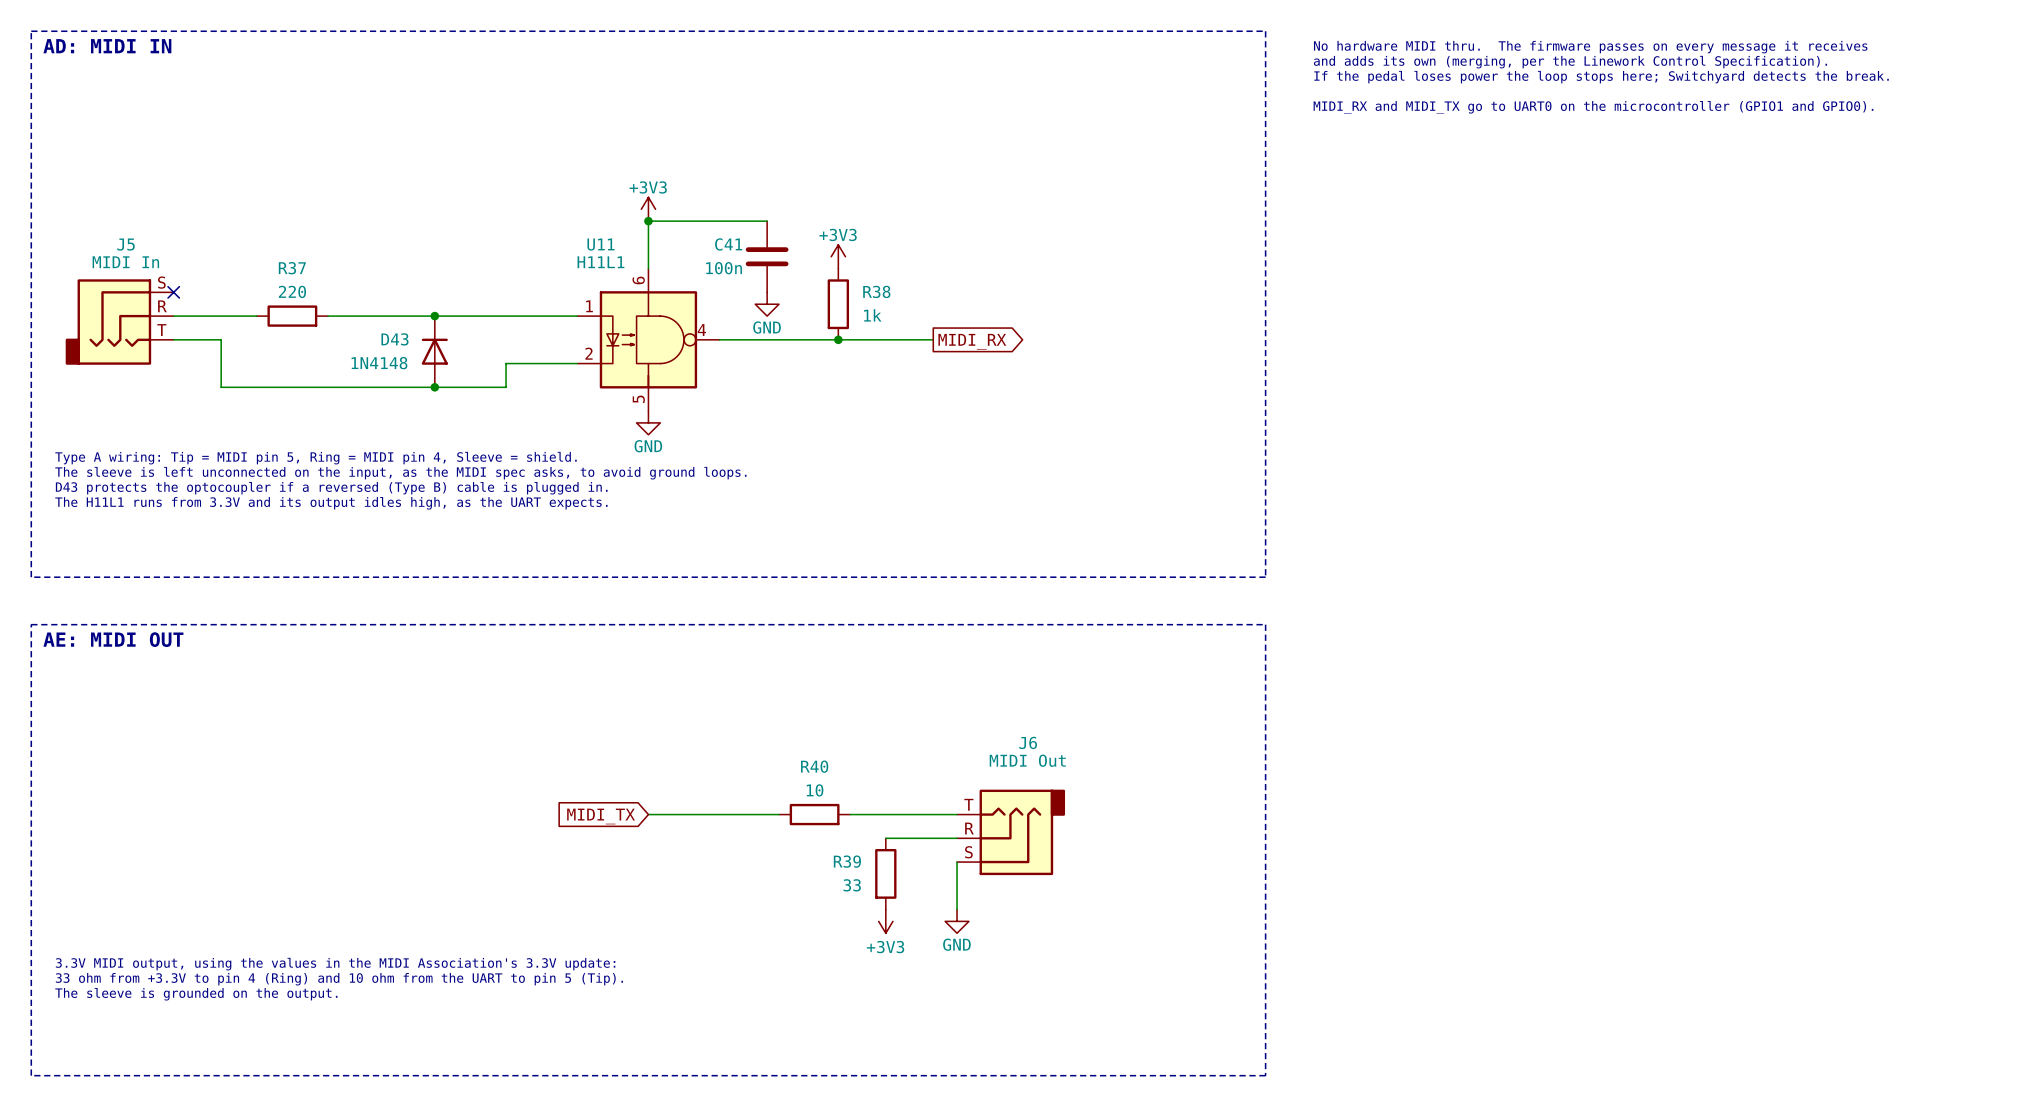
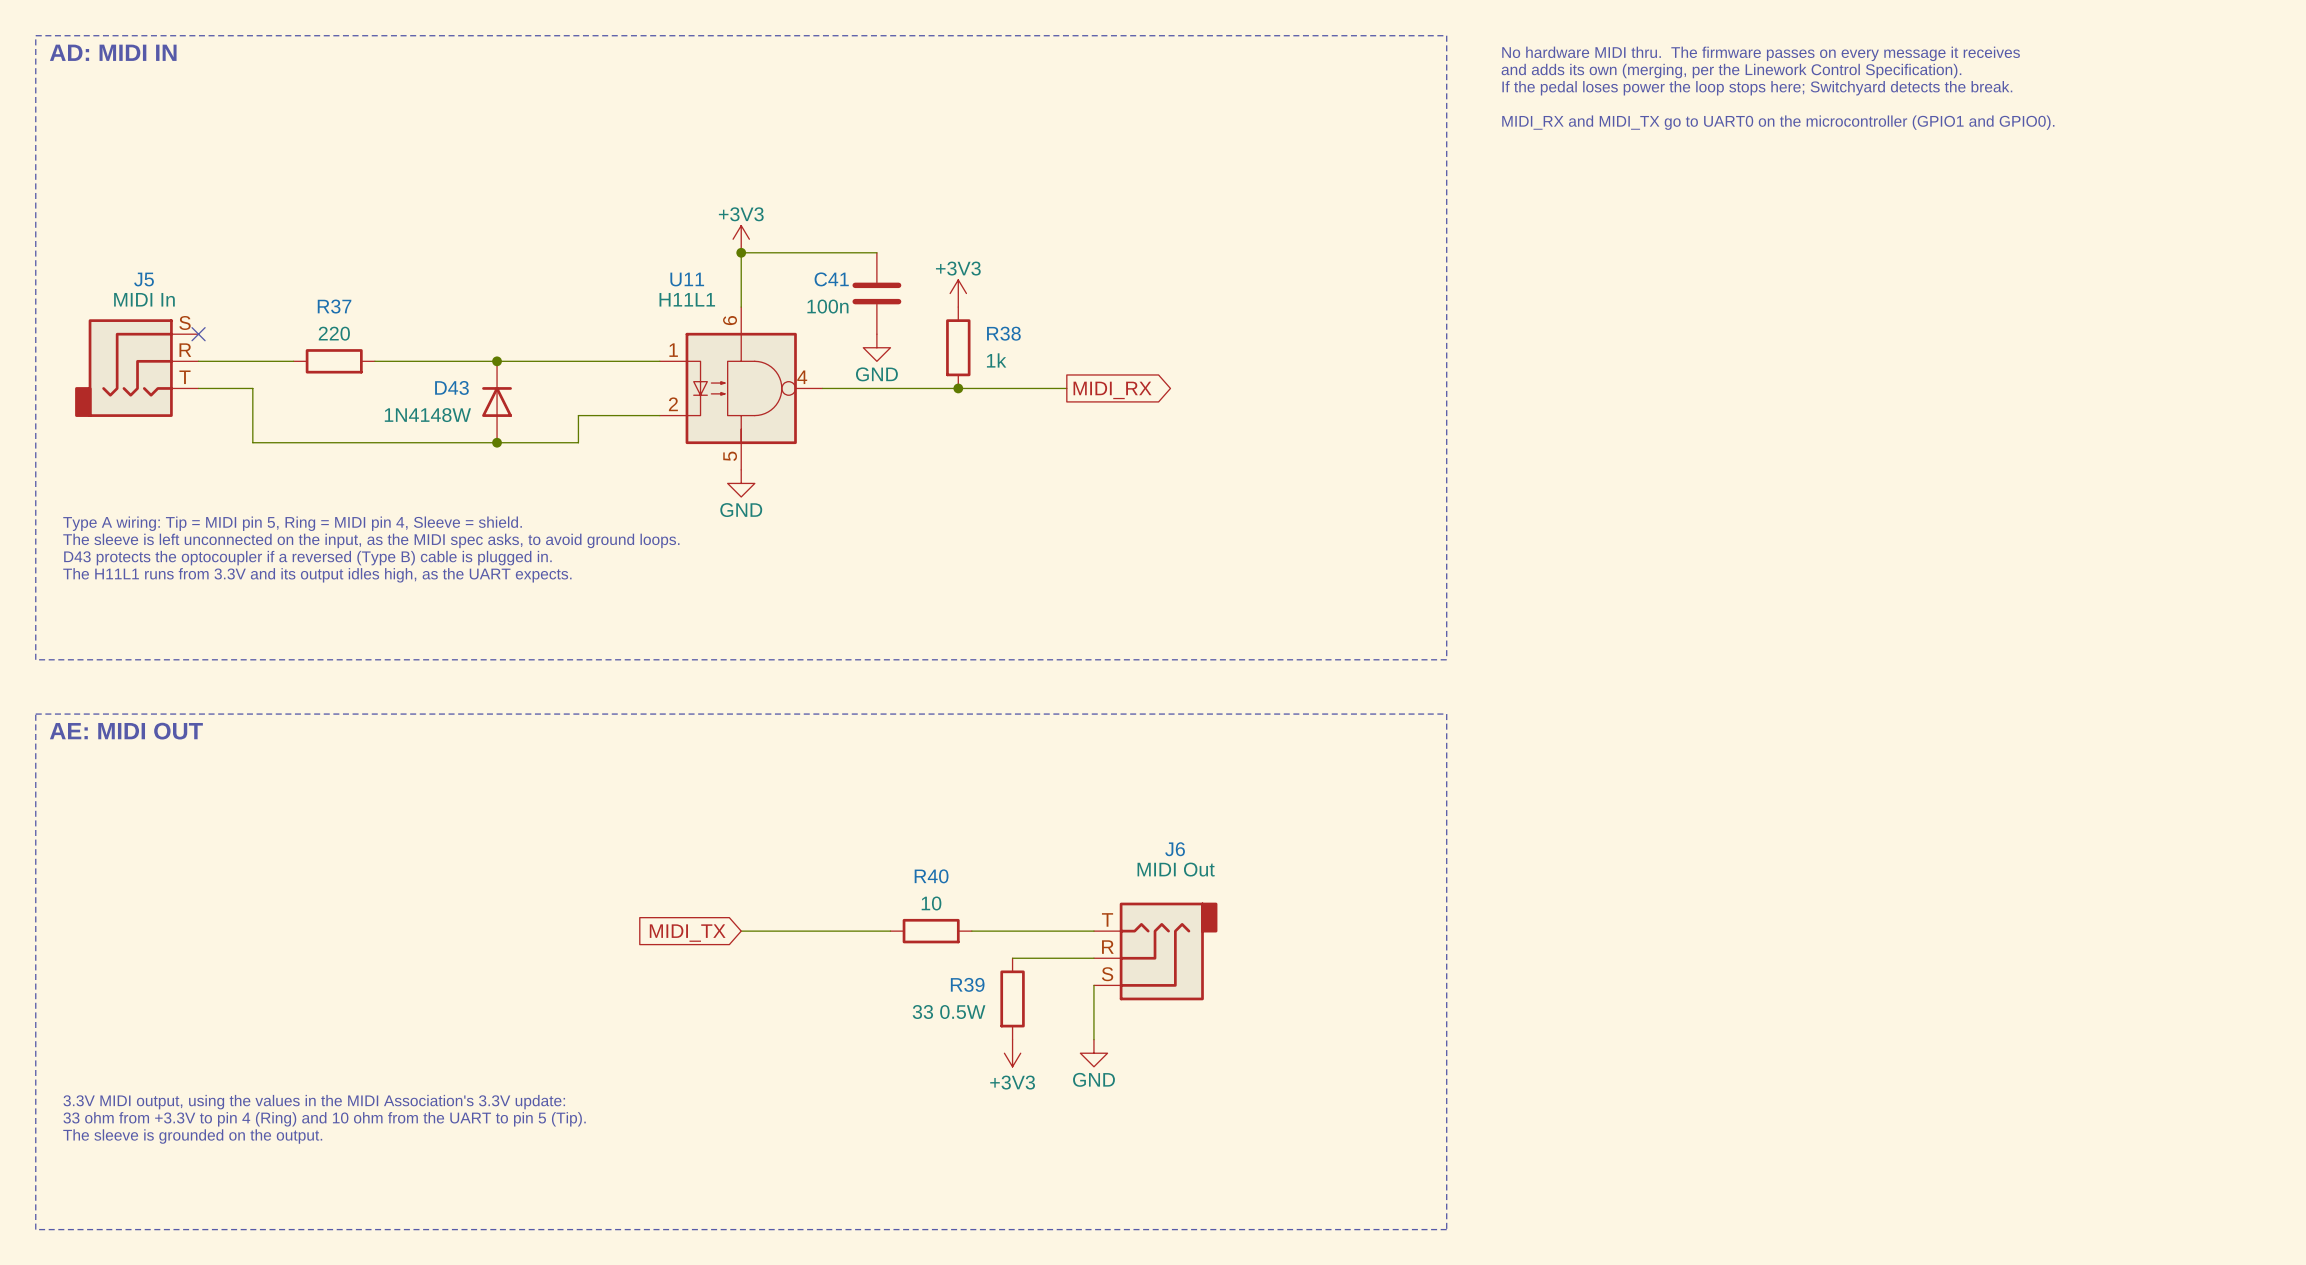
D43 value: 1N4148 (379, 363) -> 1N4148W (427, 415)
R39 value: 33 (852, 885) -> 33 0.5W (949, 1012)

